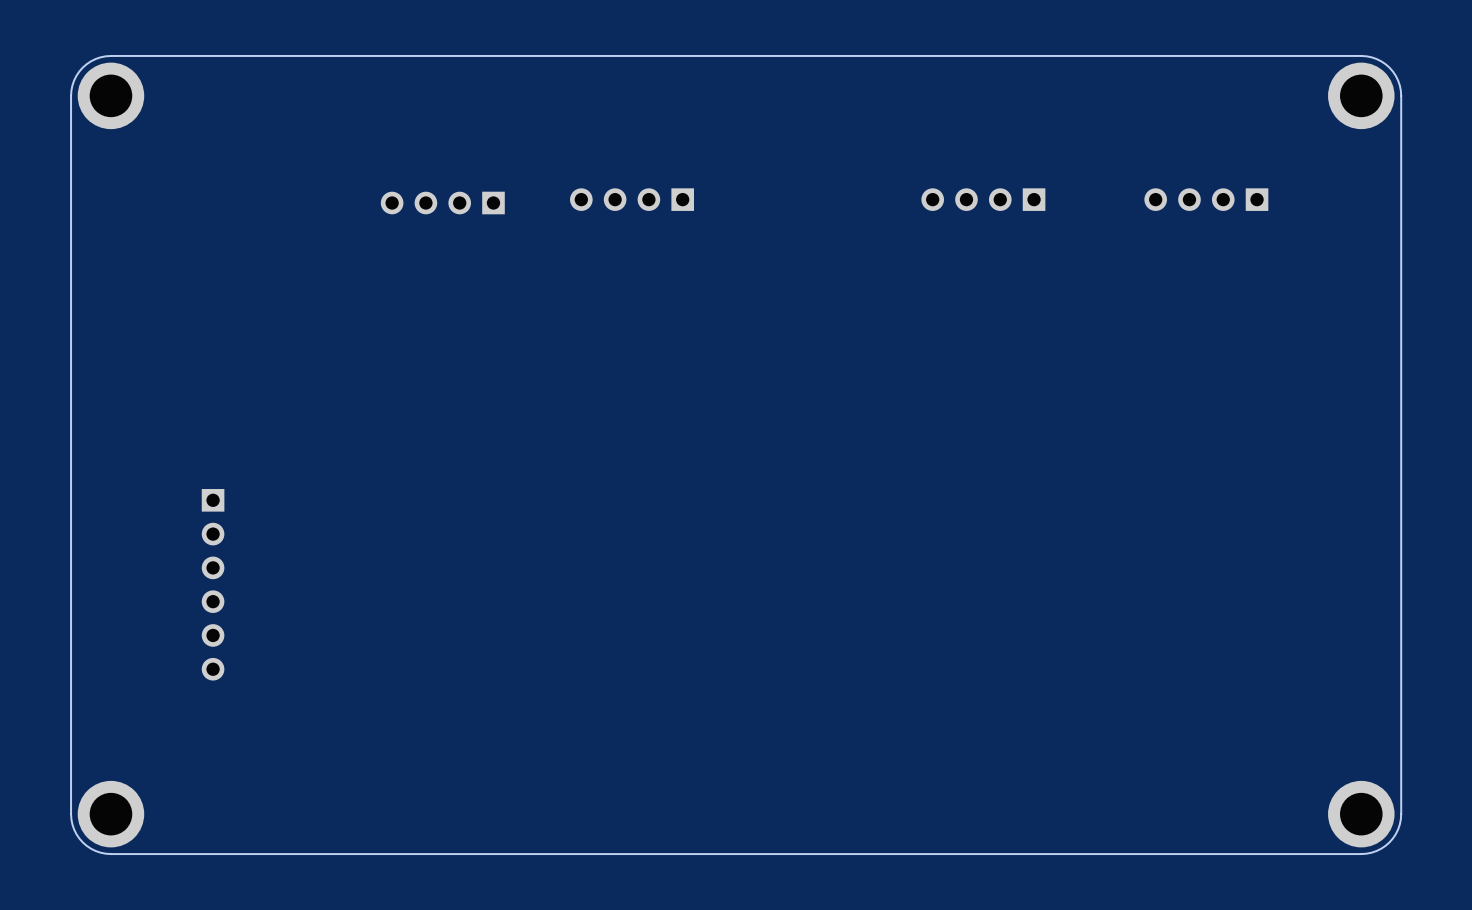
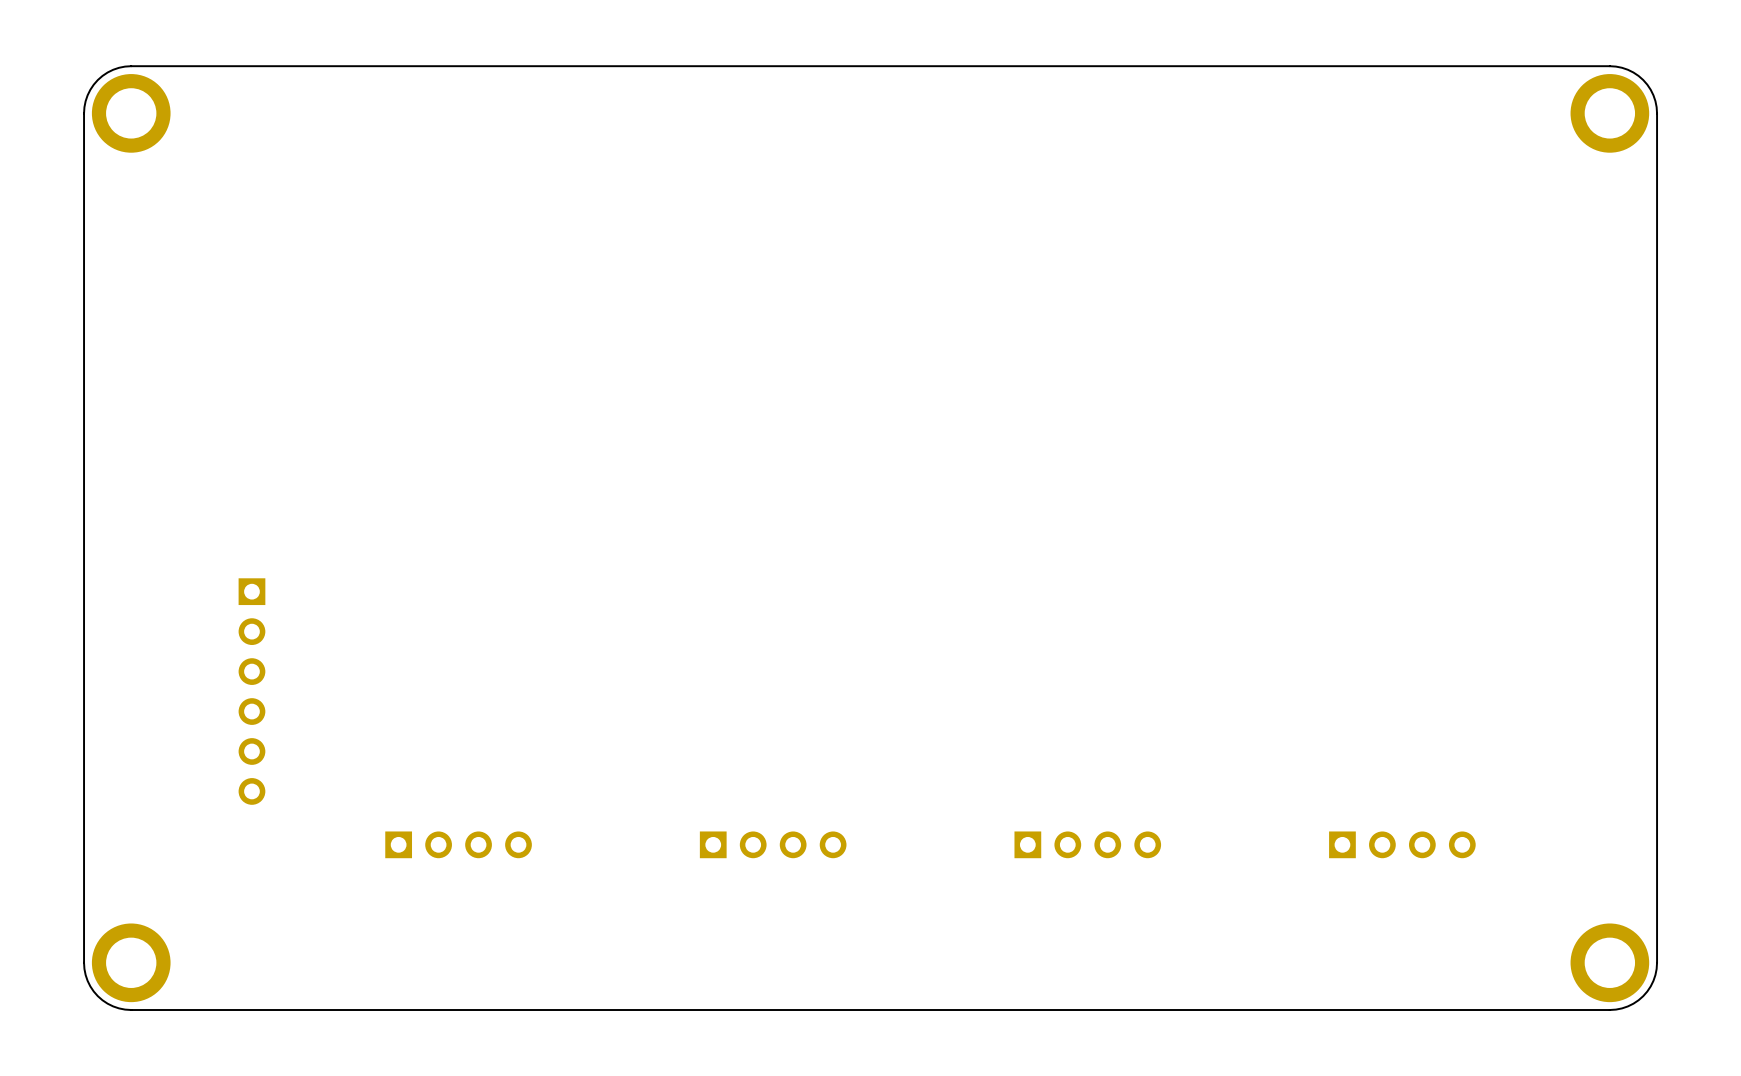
part: (632, 199) -> none
part: (983, 199) -> none
part: (1206, 199) -> none
part: (442, 203) -> none
part: none -> (458, 844)
part: none -> (773, 844)
part: none -> (1087, 844)
part: none -> (1402, 844)

